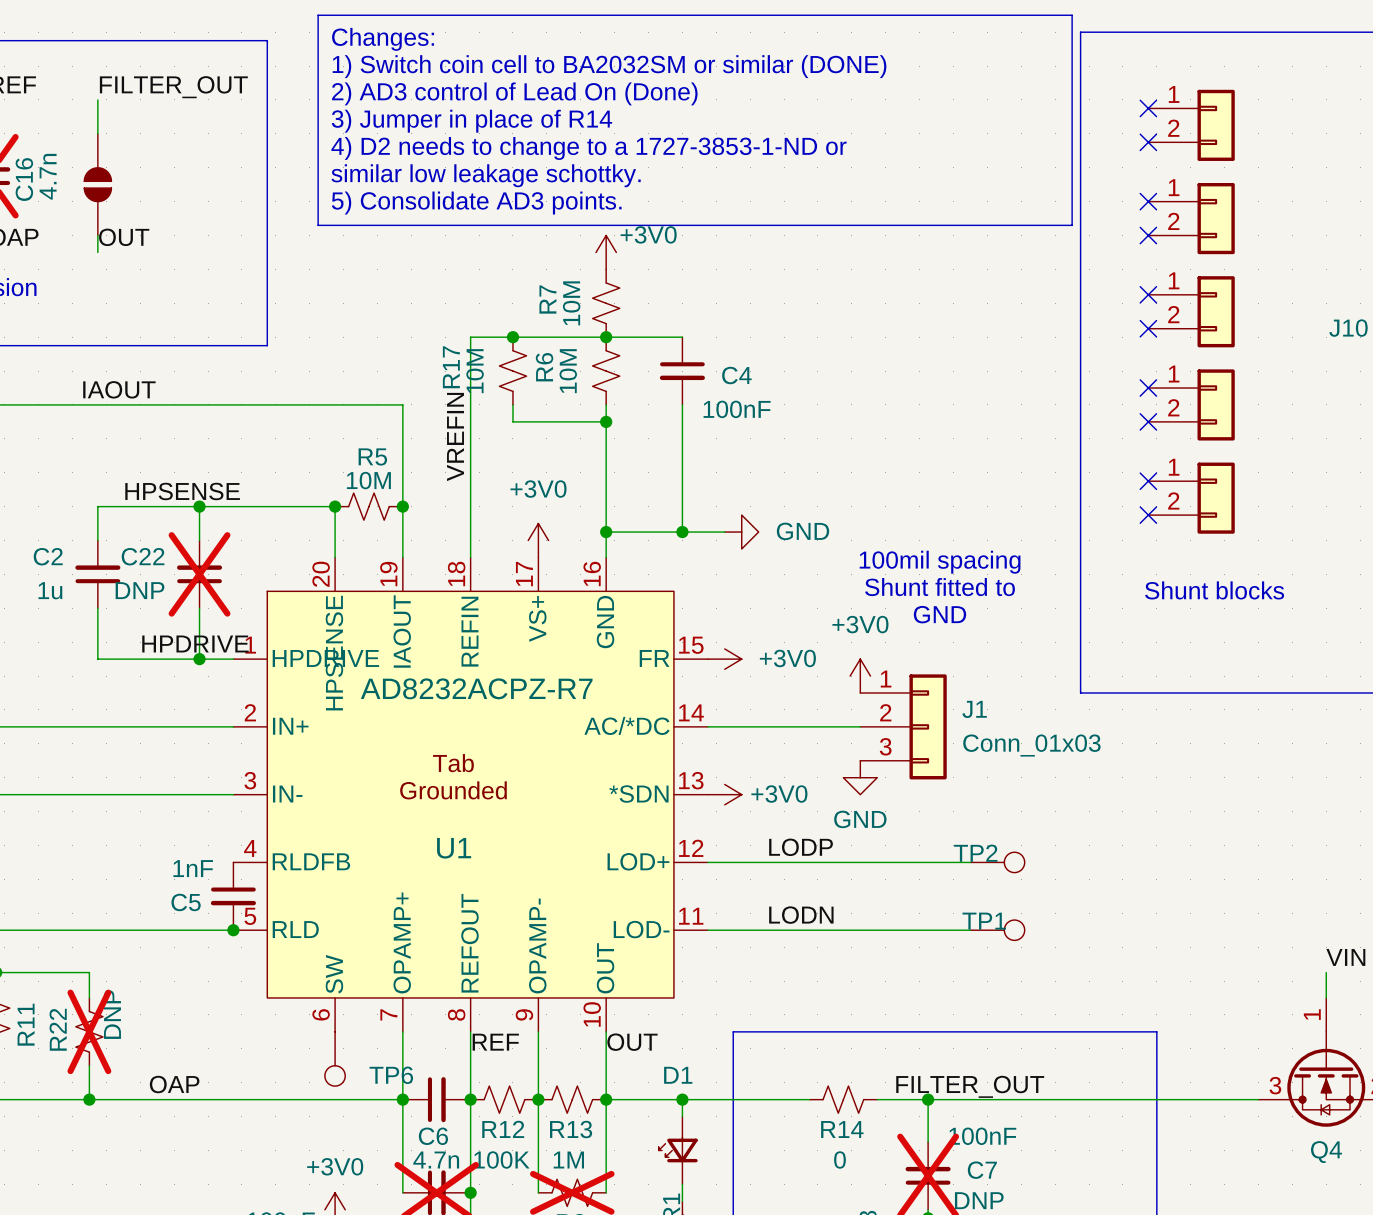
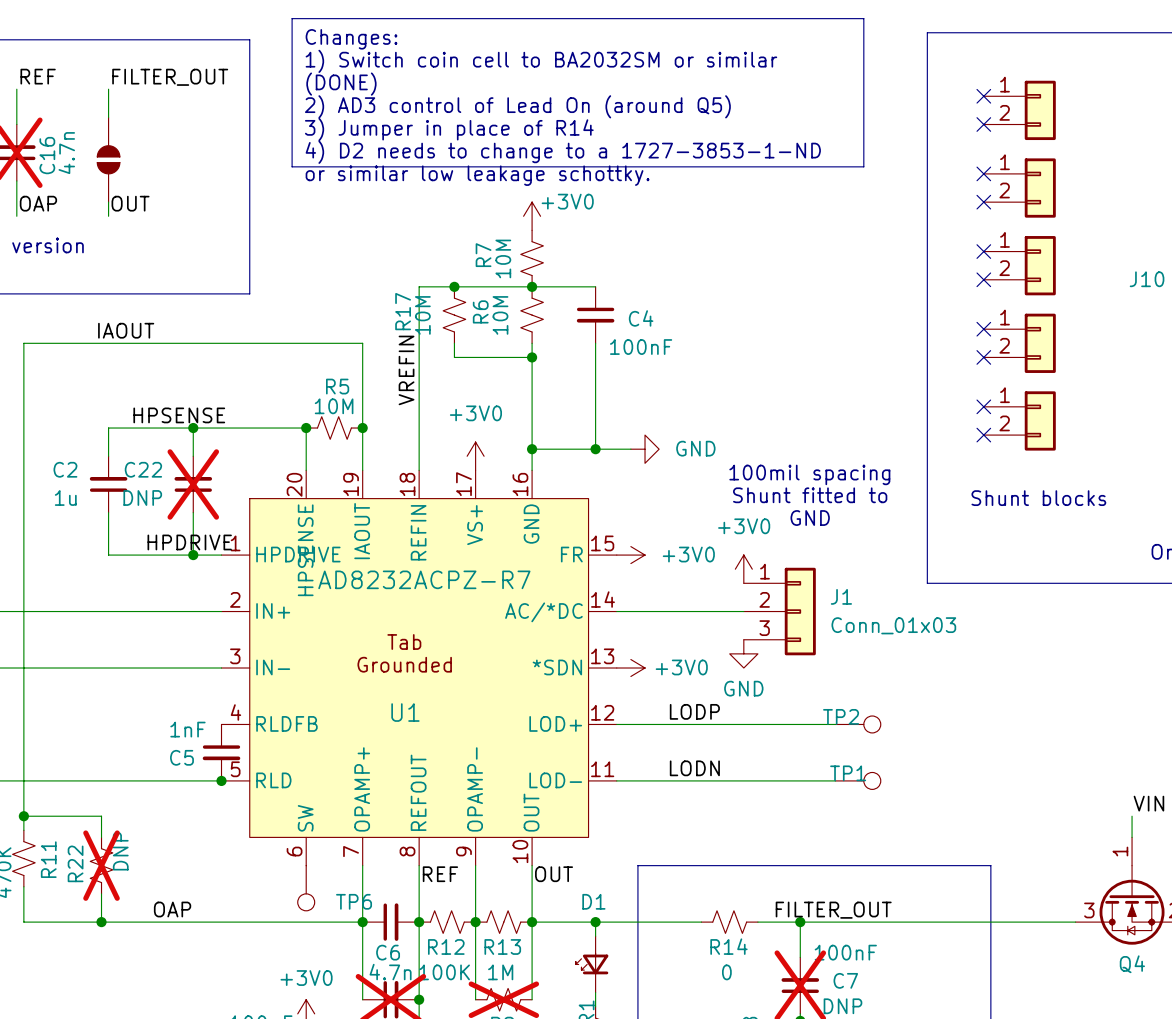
line: (1004, 15) (1072, 15) (1072, 225) (318, 225) (318, 193) -> (863, 18) (863, 166) (292, 166)
text: 1) Switch coin cell to BA2032SM or similar (DONE) (609, 66) -> 1) Switch coin cell to BA2032SM or similar (541, 61)
text: 2) AD3 control of Lead On (Done) (514, 93) -> (DONE) (341, 84)
text: 3) Jumper in place of R14 (471, 121) -> 2) AD3 control of Lead On (around Q5) (517, 106)
text: 4) D2 needs to change to a 1727-3853-1-ND or (588, 148) -> 3) Jumper in place of R14 (449, 129)
text: similar low leakage schottky. (486, 175) -> 4) D2 needs to change to a 1727-3853-1-ND (563, 152)
text: 5) Consolidate AD3 points. (476, 203) -> or similar low leakage schottky. (477, 175)

